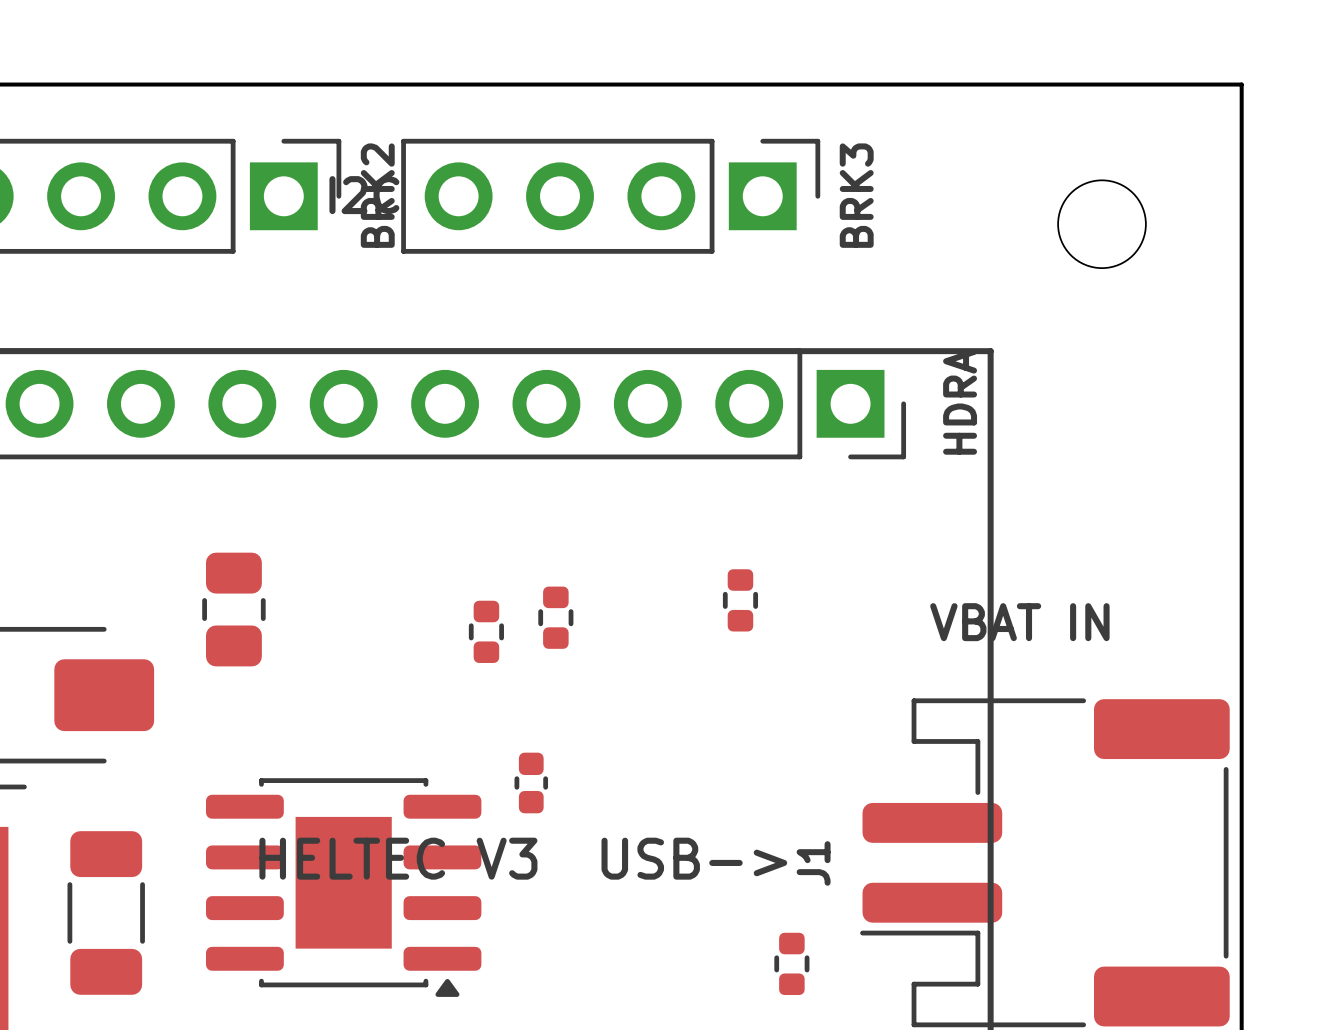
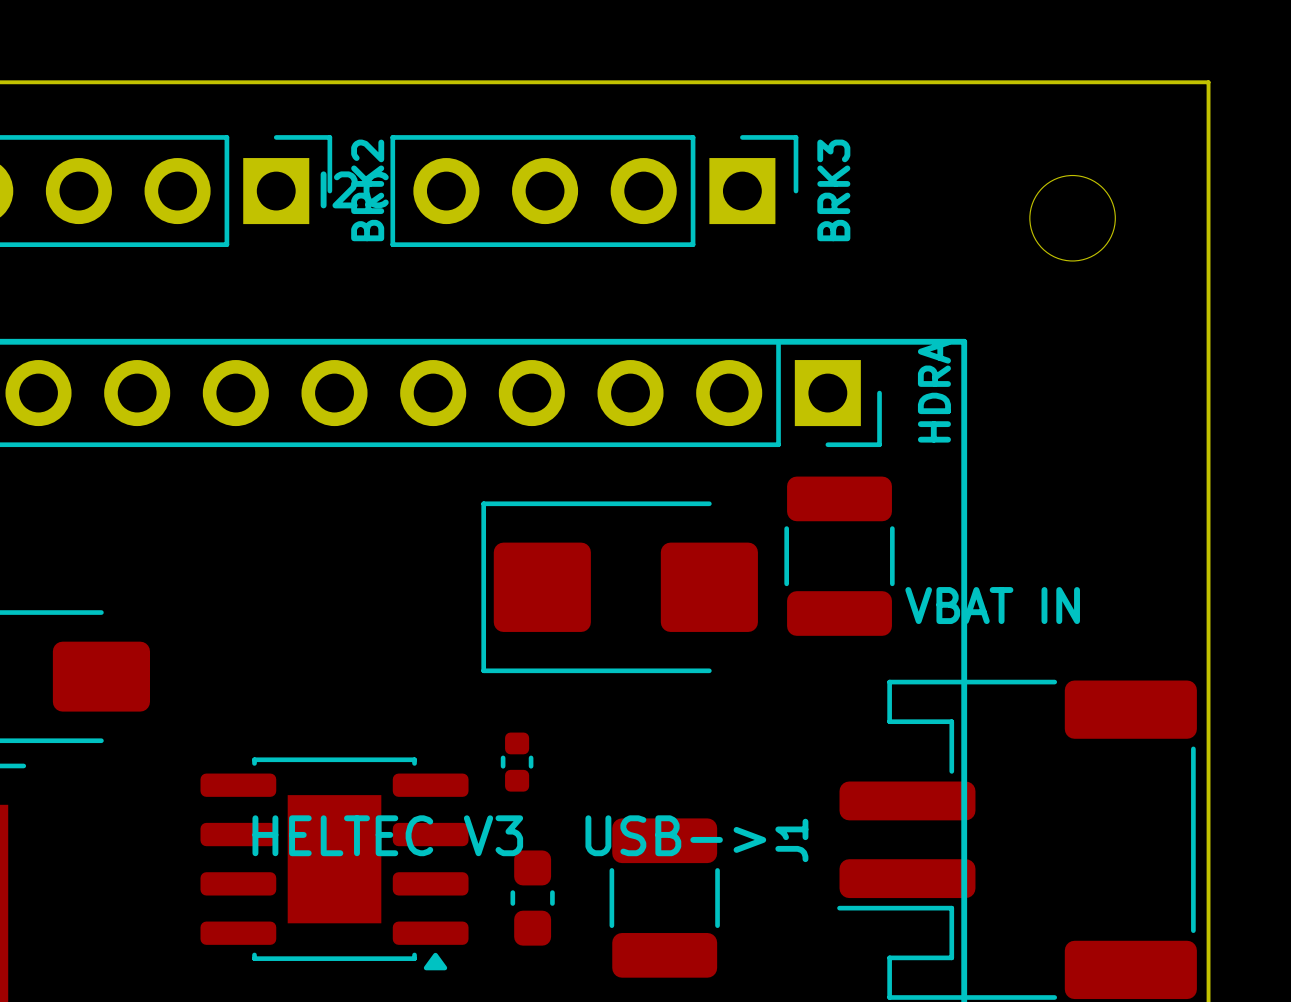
part: none -> (839, 556)
part: (740, 600) -> none
part: none -> (619, 587)
part: (233, 609) -> none
part: (555, 617) -> none
part: (486, 631) -> none
part: (106, 912) -> none
part: none -> (532, 898)
part: none -> (664, 898)
part: (791, 963) -> none

